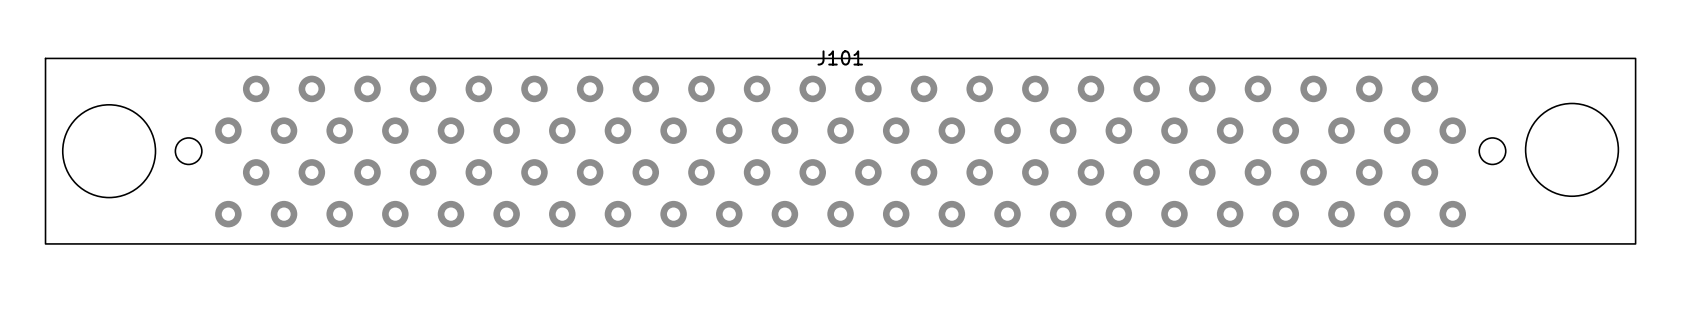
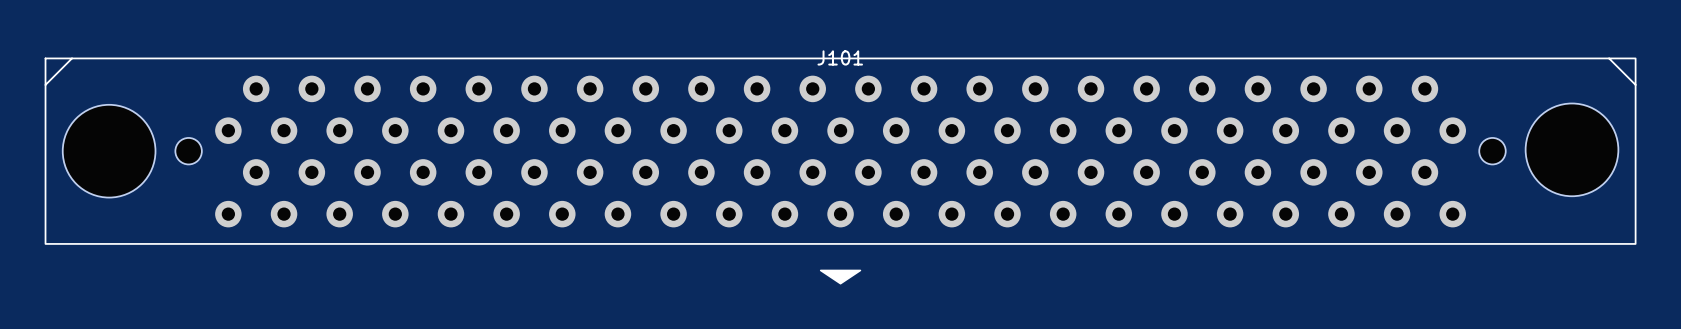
J101 footprint: [44, 57, 1637, 245] -> [44, 57, 1637, 285]

